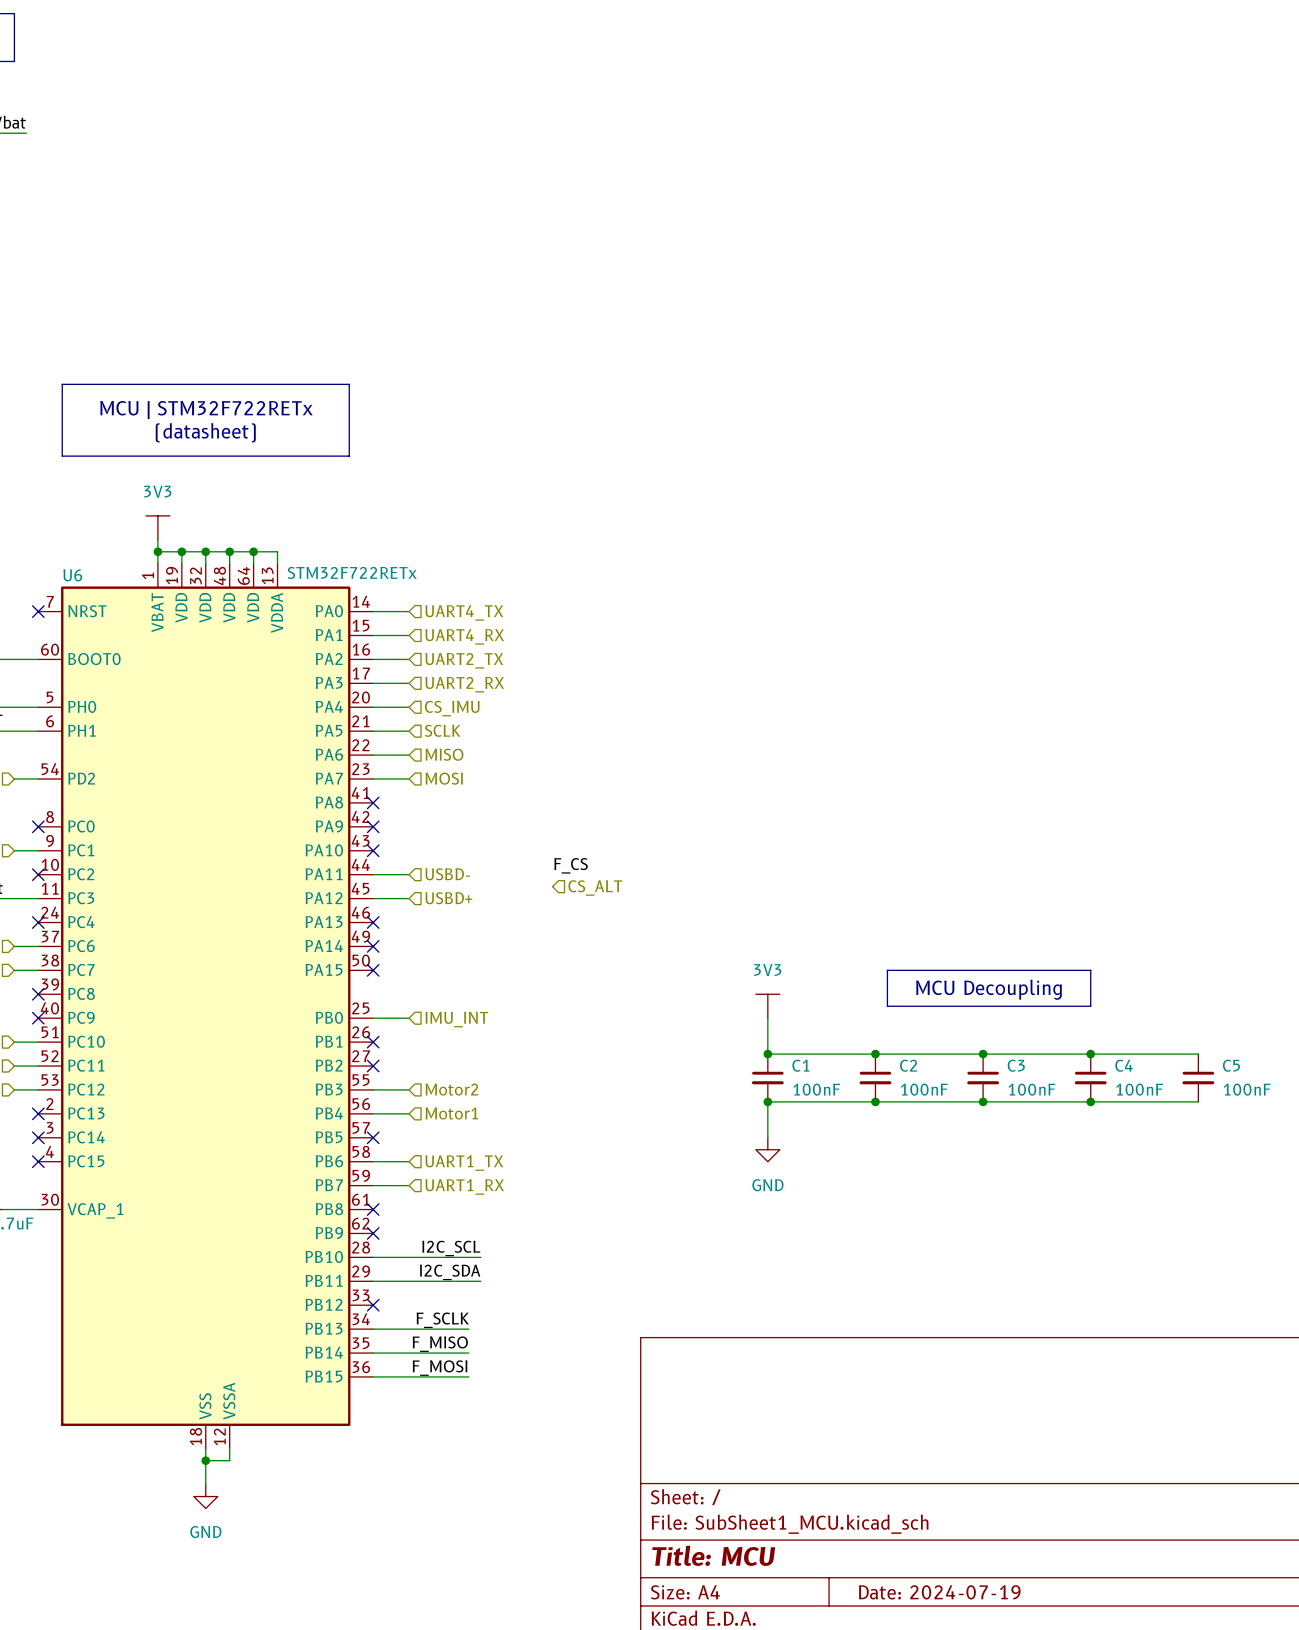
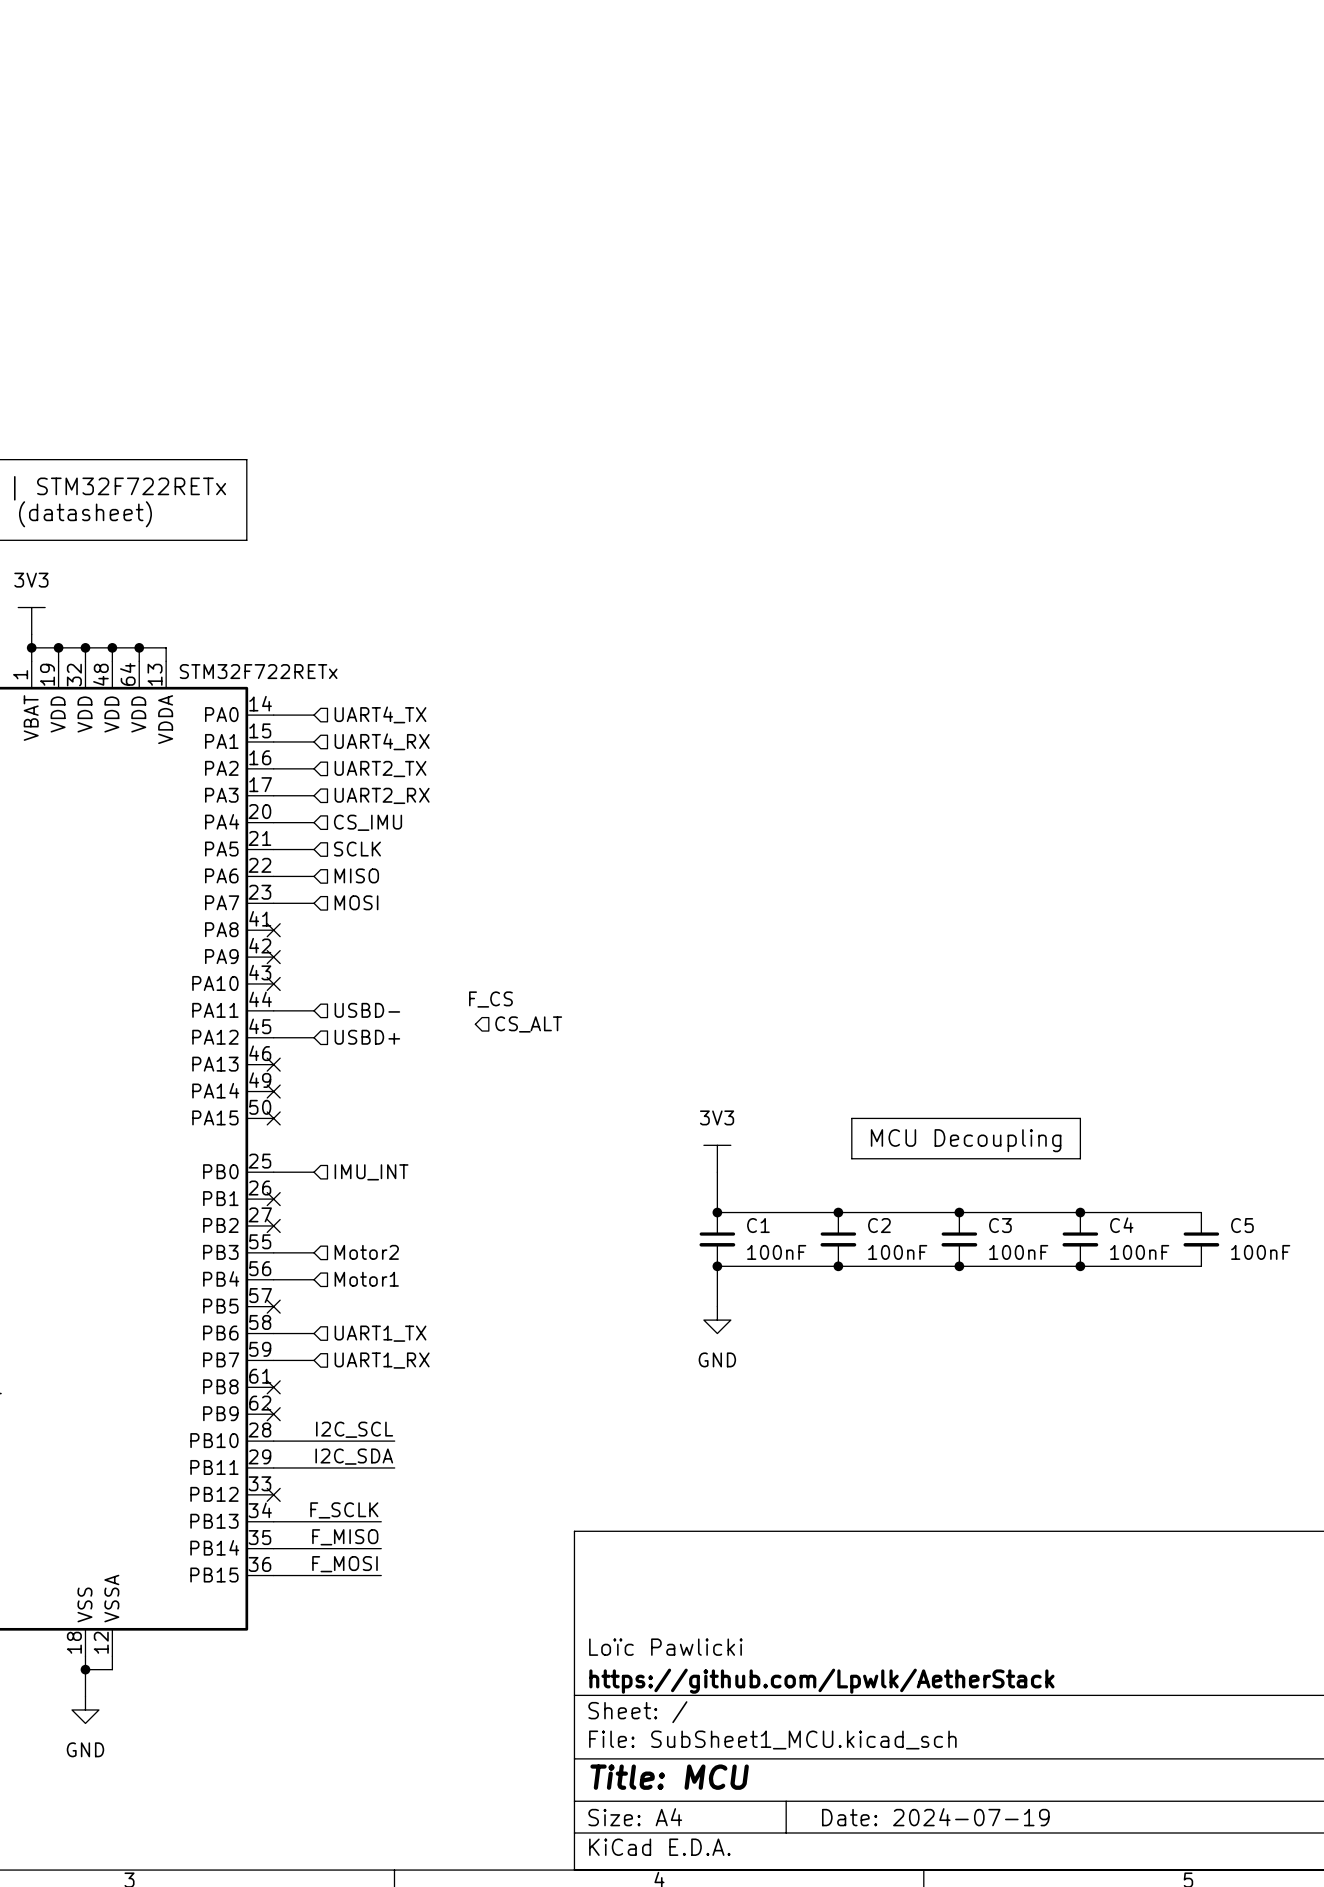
title block: none -> Loïc Pawlicki (665, 1647)
title block: none -> https://github.com/Lpwlk/AetherStack (821, 1681)

